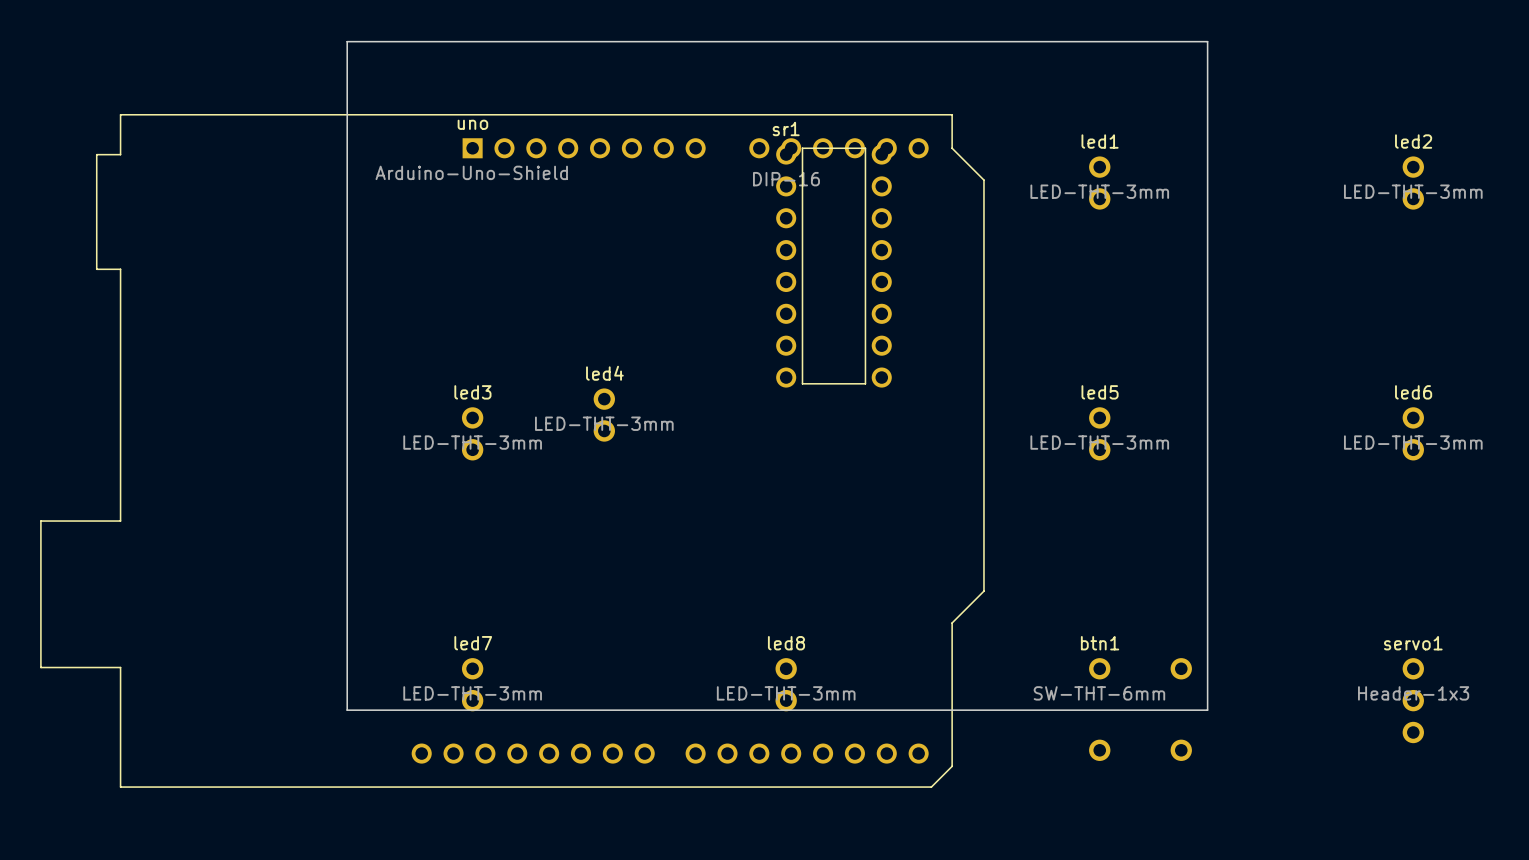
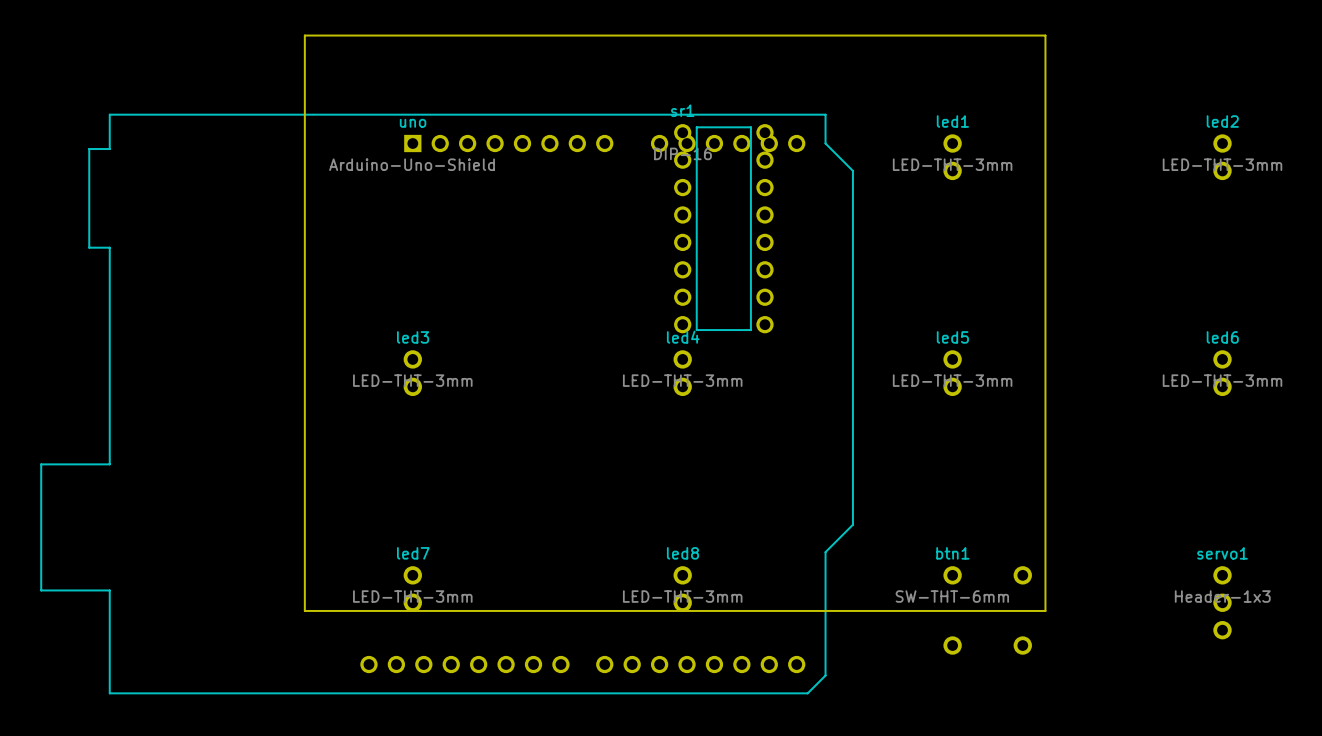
led4 position: (604, 415) -> (682, 373)
uno position: (512, 450) -> (447, 404)

